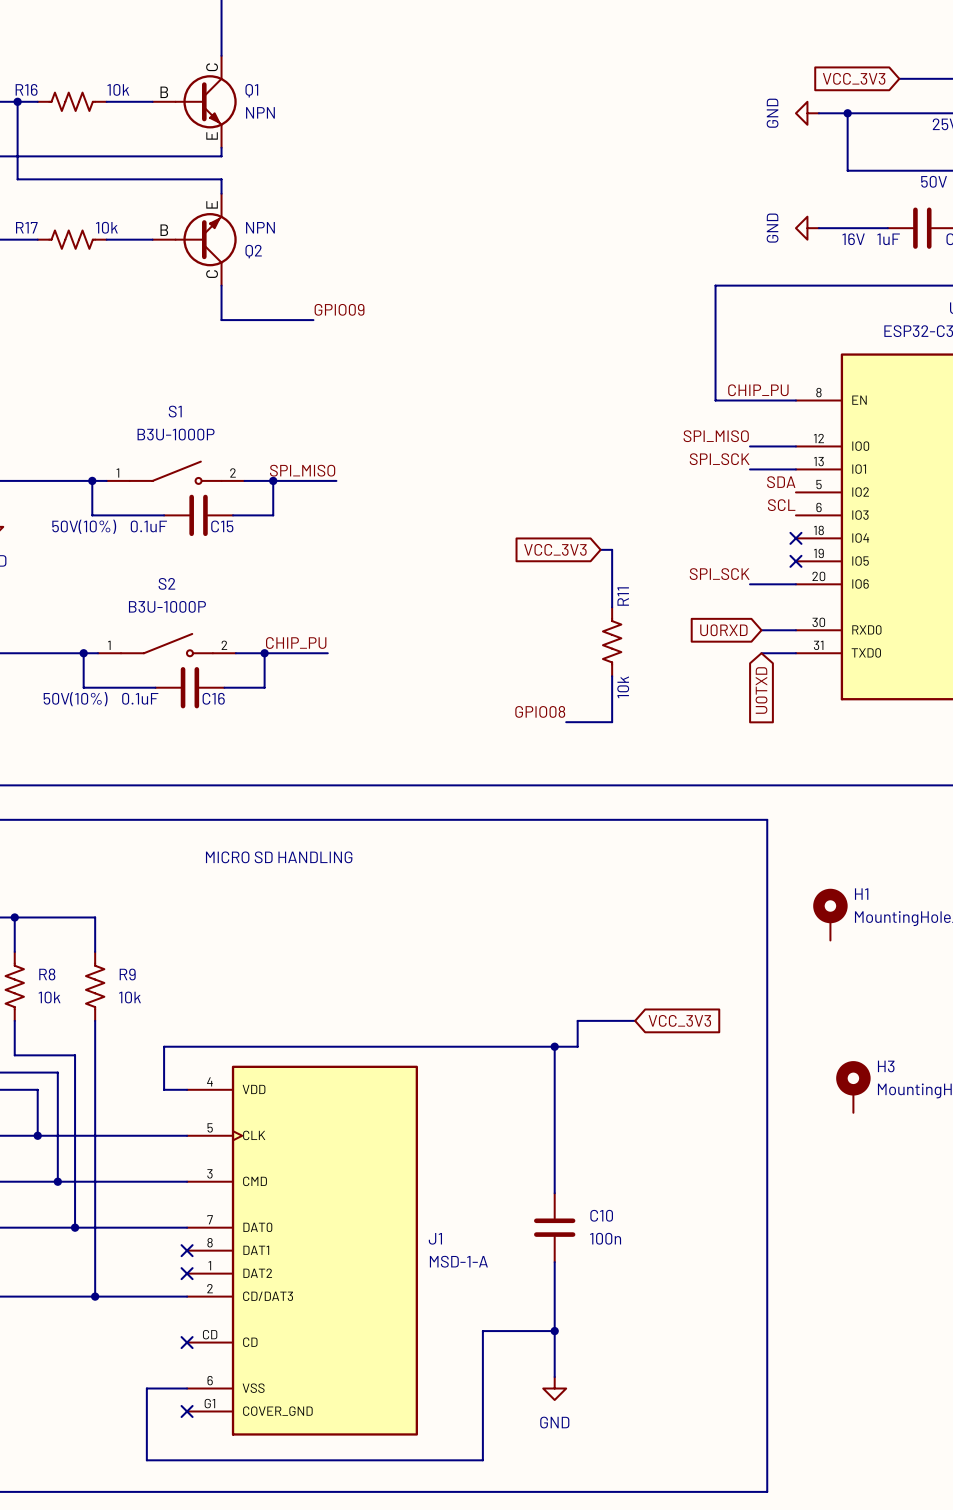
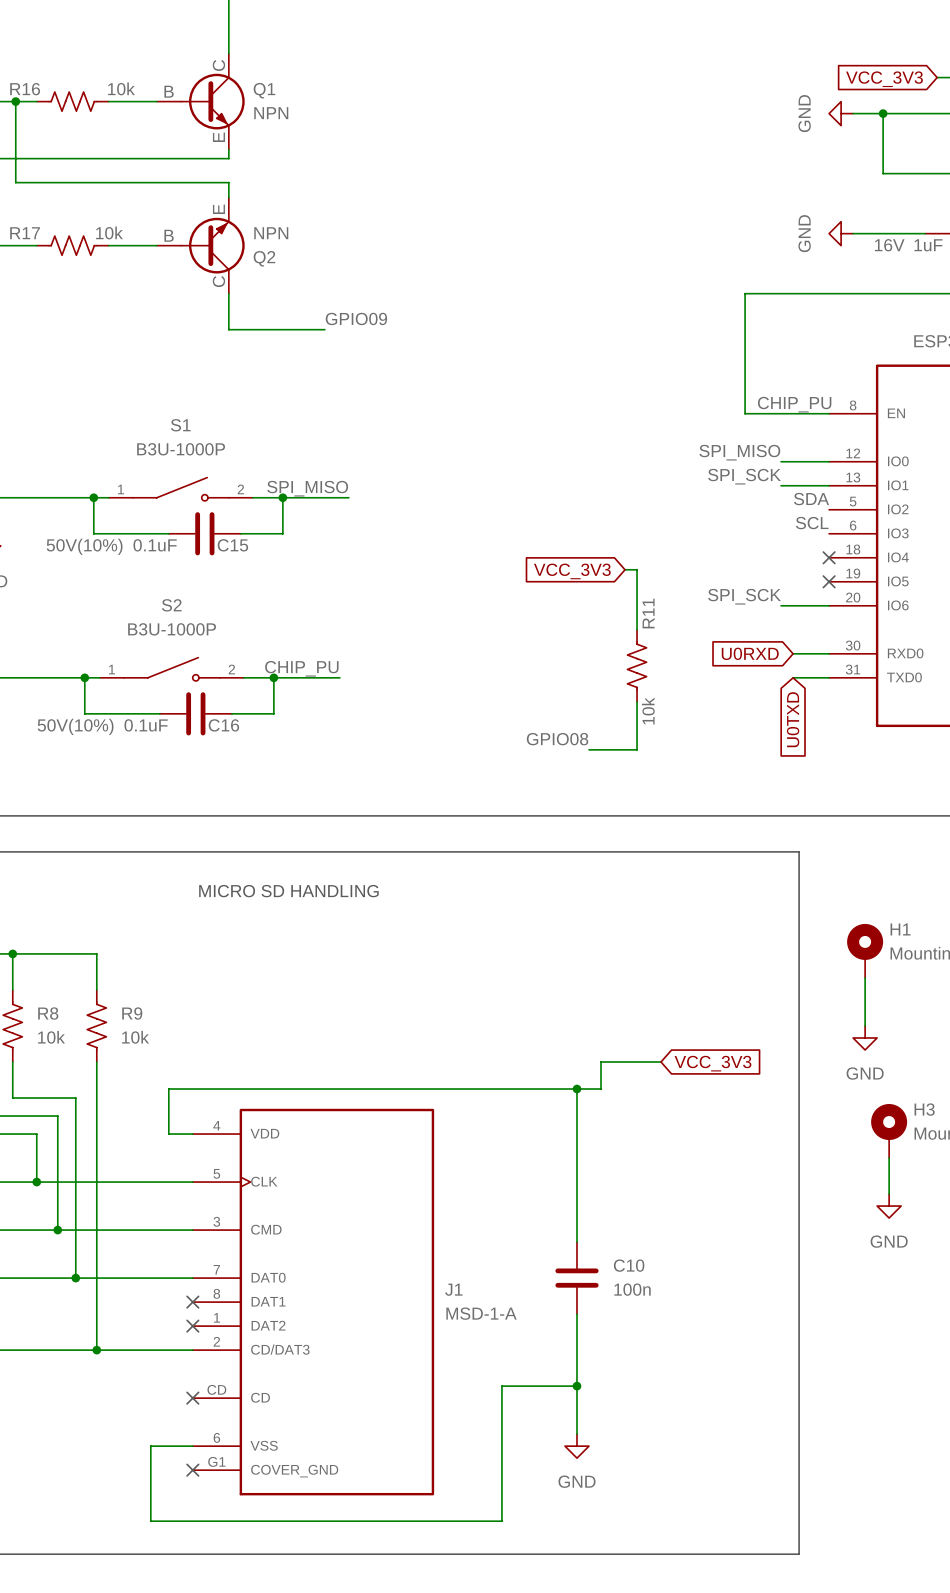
wire: none -> (865, 977) (865, 1025)
power symbol: none -> GND (865, 1037)
wire: none -> (889, 1158) (889, 1194)
power symbol: none -> GND (889, 1206)

